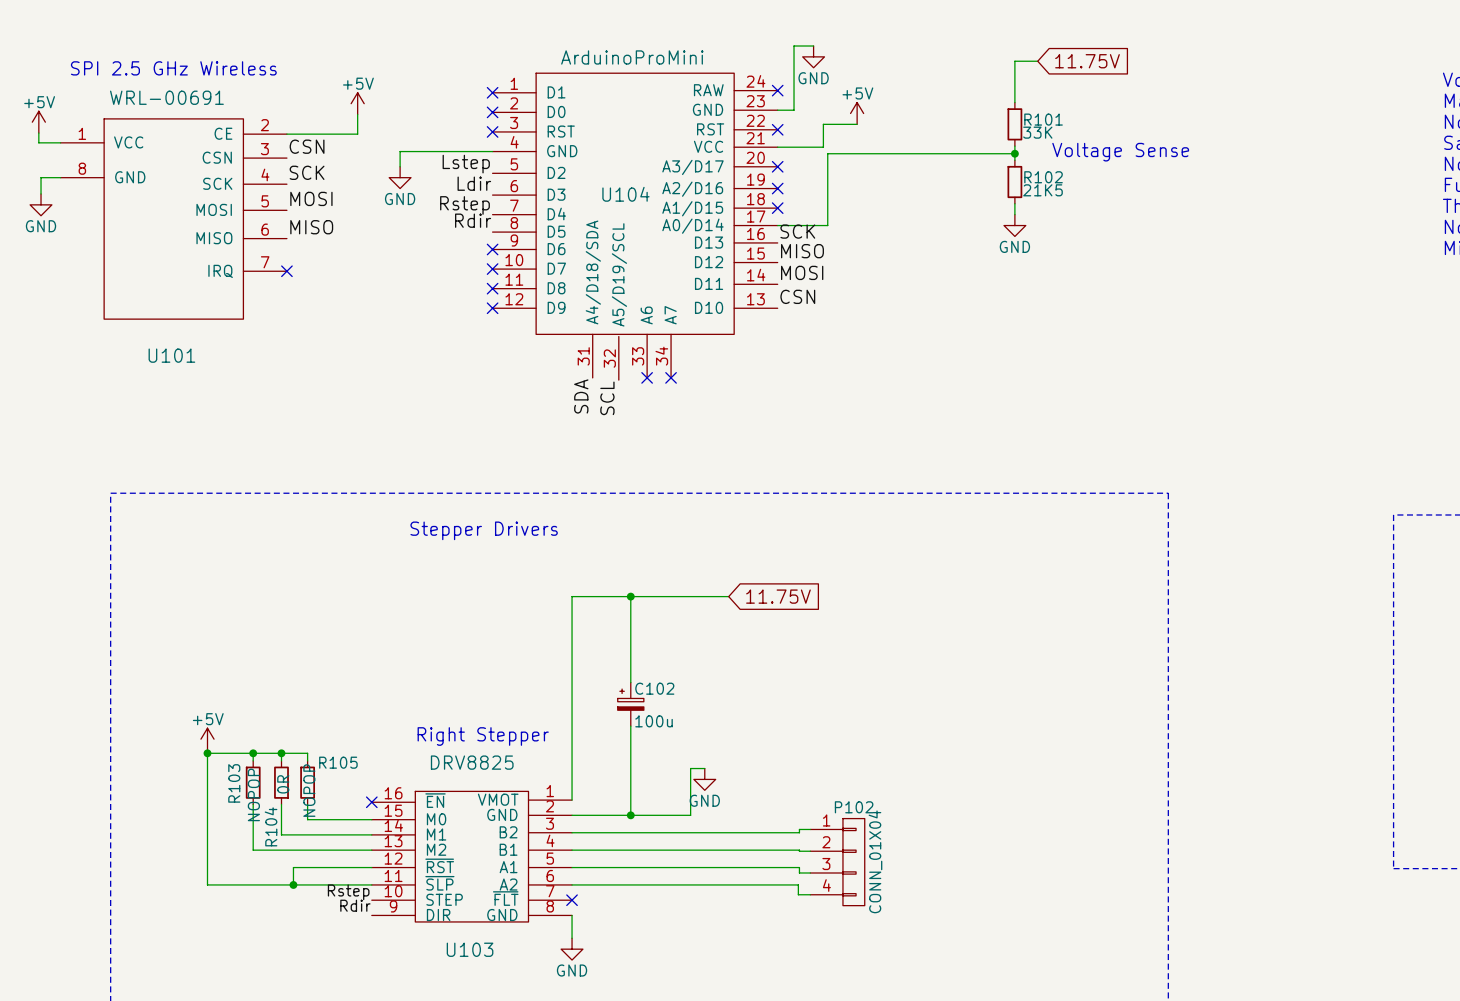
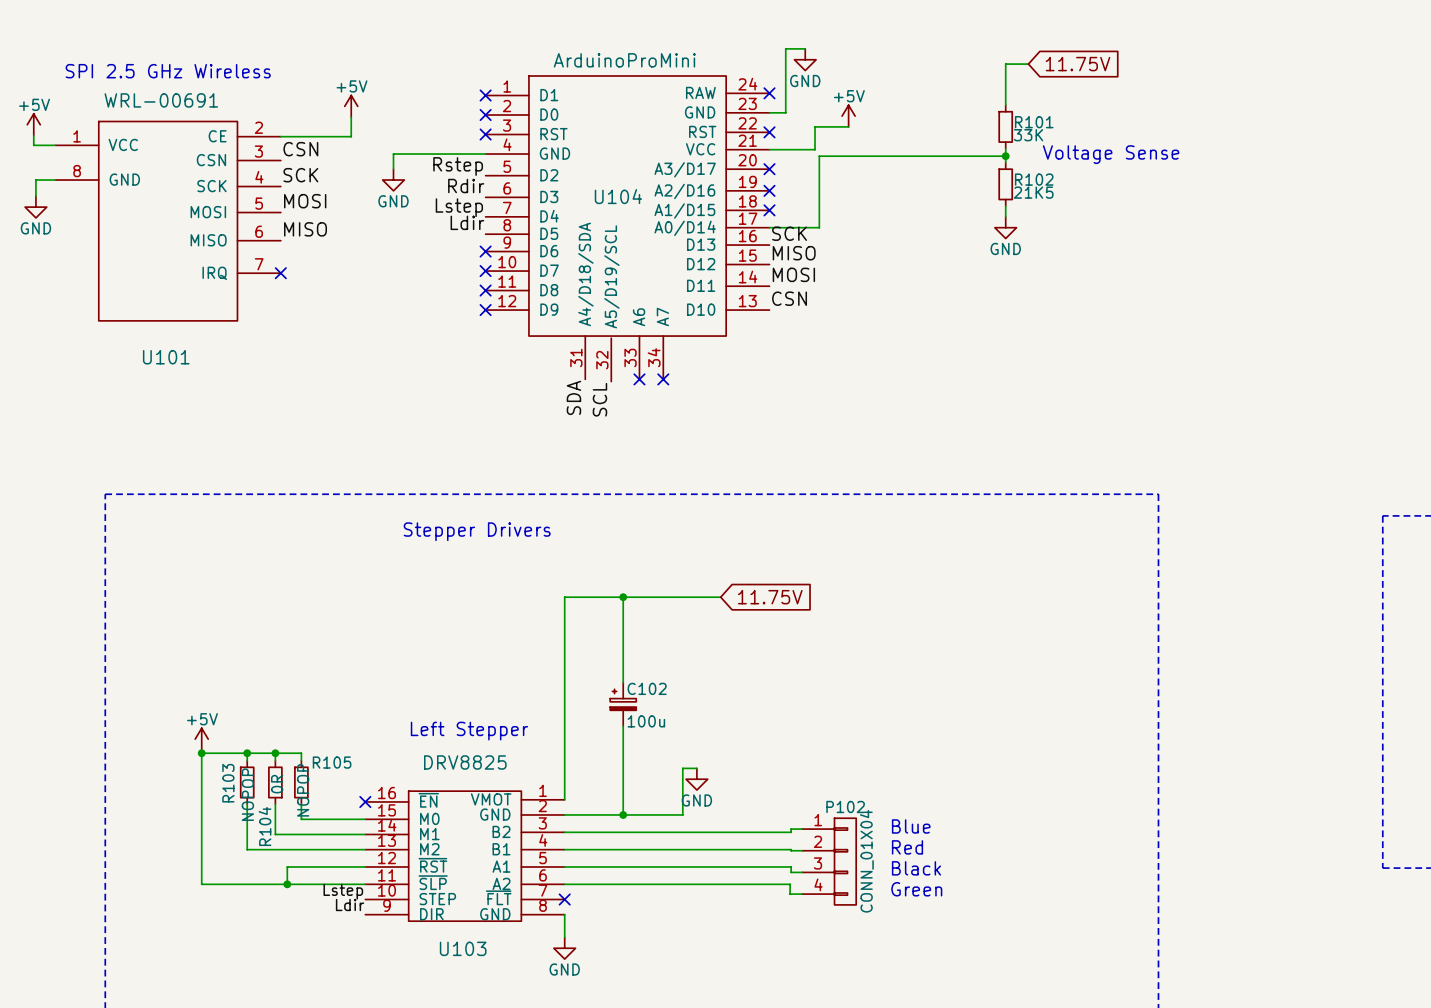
label: Lstep (466, 164) -> Rstep (458, 166)
label: Ldir (474, 183) -> Rdir (466, 186)
label: Rstep (464, 205) -> Lstep (459, 207)
label: Rdir (473, 220) -> Ldir (467, 222)
text: Right Stepper (483, 736) -> Left Stepper (469, 731)
text: none -> Blue (911, 826)
text: none -> Red (907, 847)
text: none -> Black (916, 868)
text: none -> Green (916, 889)
label: Rstep (348, 892) -> Lstep (343, 891)
label: Rdir (355, 905) -> Ldir (350, 905)

